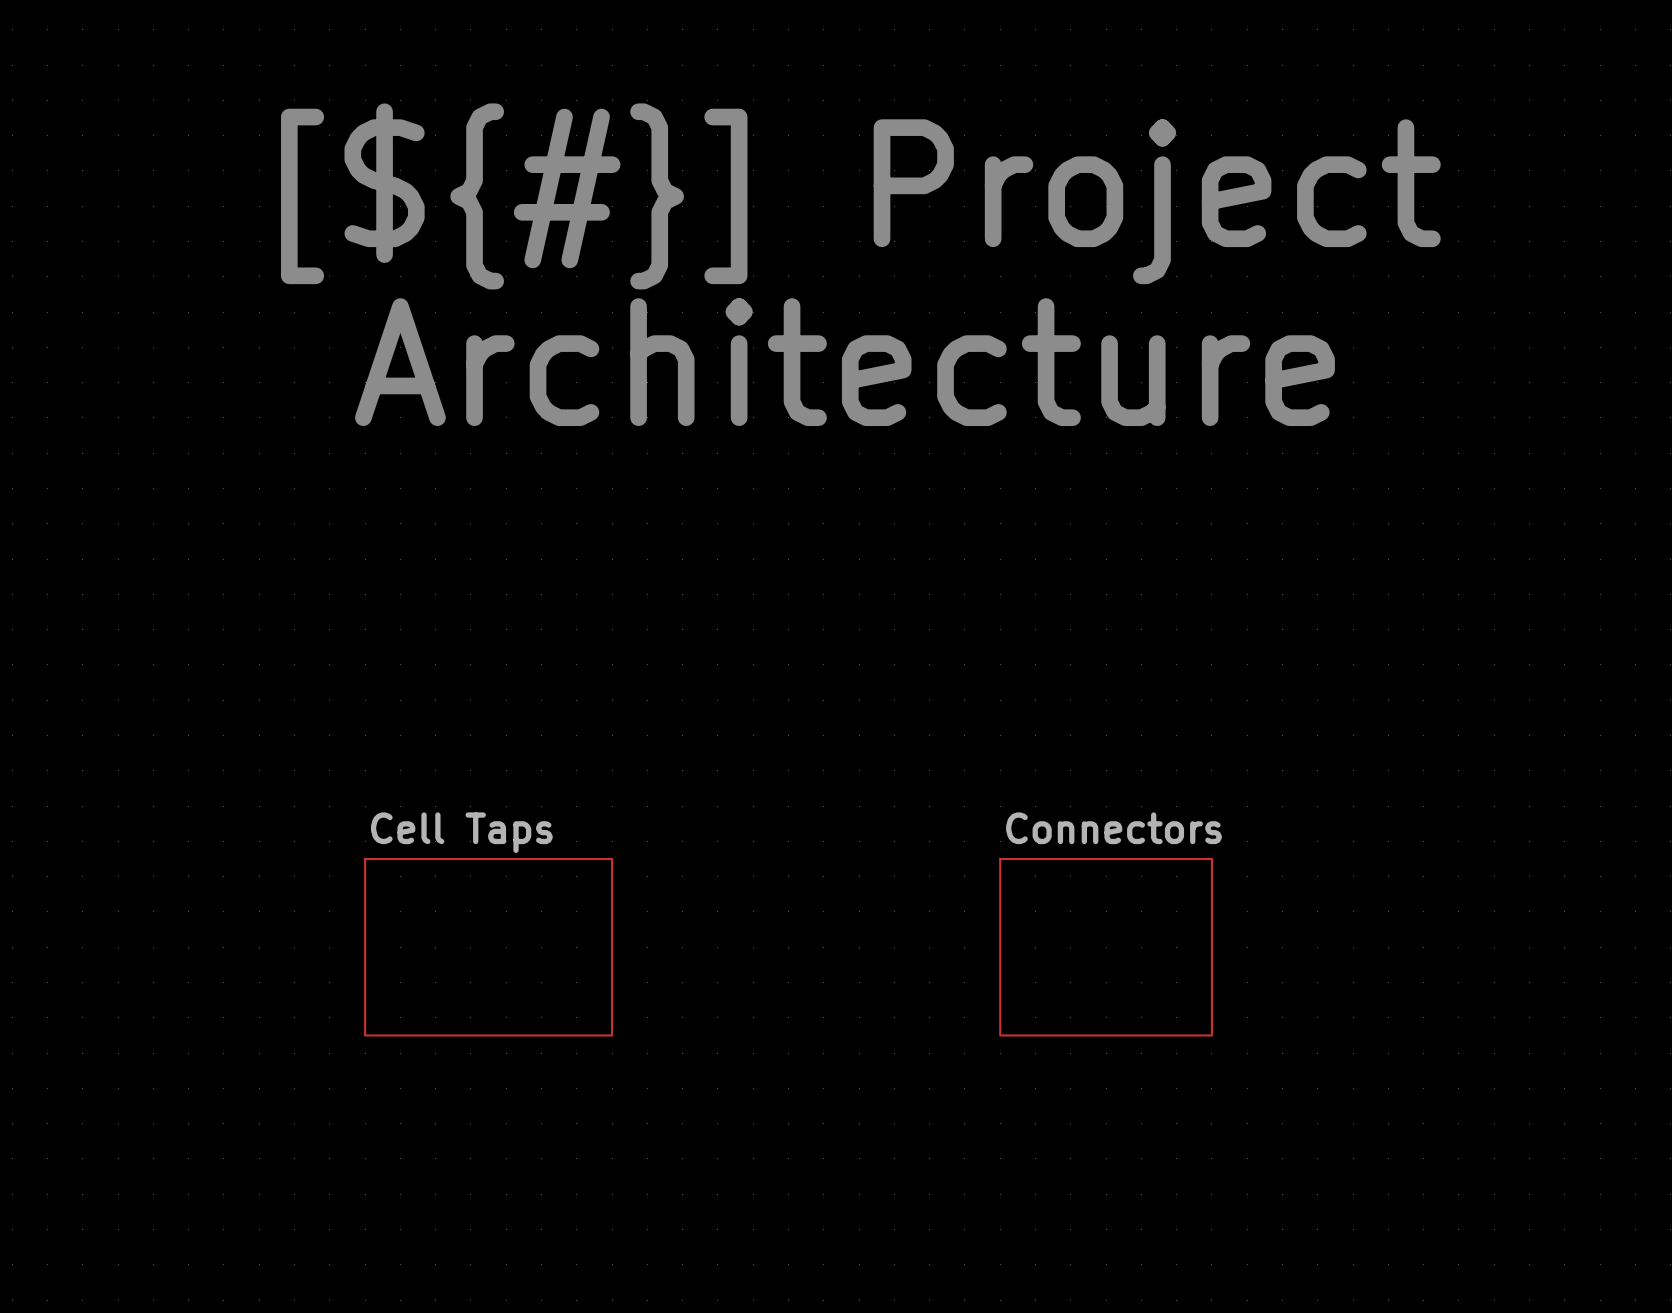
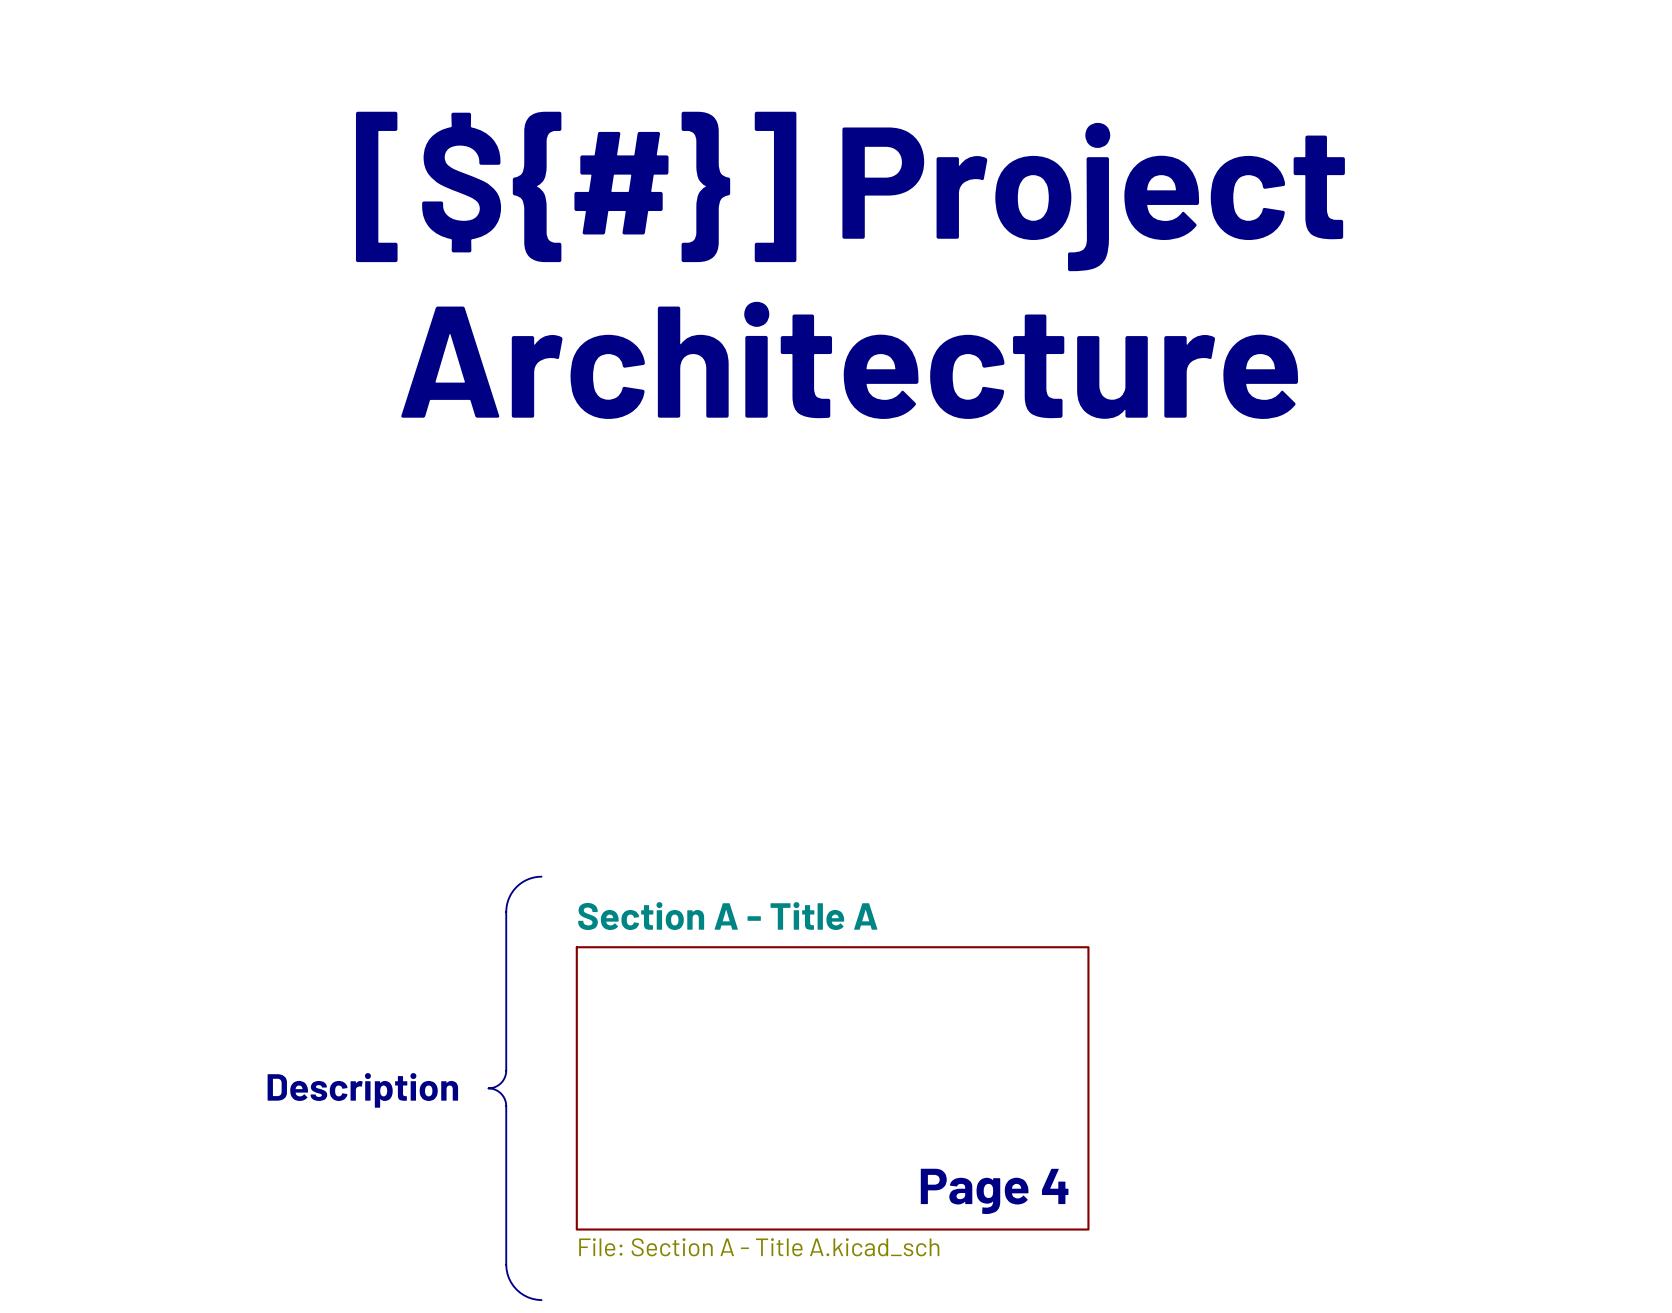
line: none -> (541, 876) (529, 878) (519, 884) (511, 893) (507, 904) (506, 1073) (499, 1084) (488, 1088) (499, 1092) (506, 1103) (507, 1273) (513, 1286) (520, 1292) (532, 1298) (541, 1300)
sheet Cell Taps: (488, 947) -> none
sheet Connectors: (1106, 947) -> none
sheet Section A - Title A: none -> File: Section A - Title A.kicad_sch (832, 1088)
text: none -> Description (362, 1090)
text: none -> Page 4 (994, 1191)

